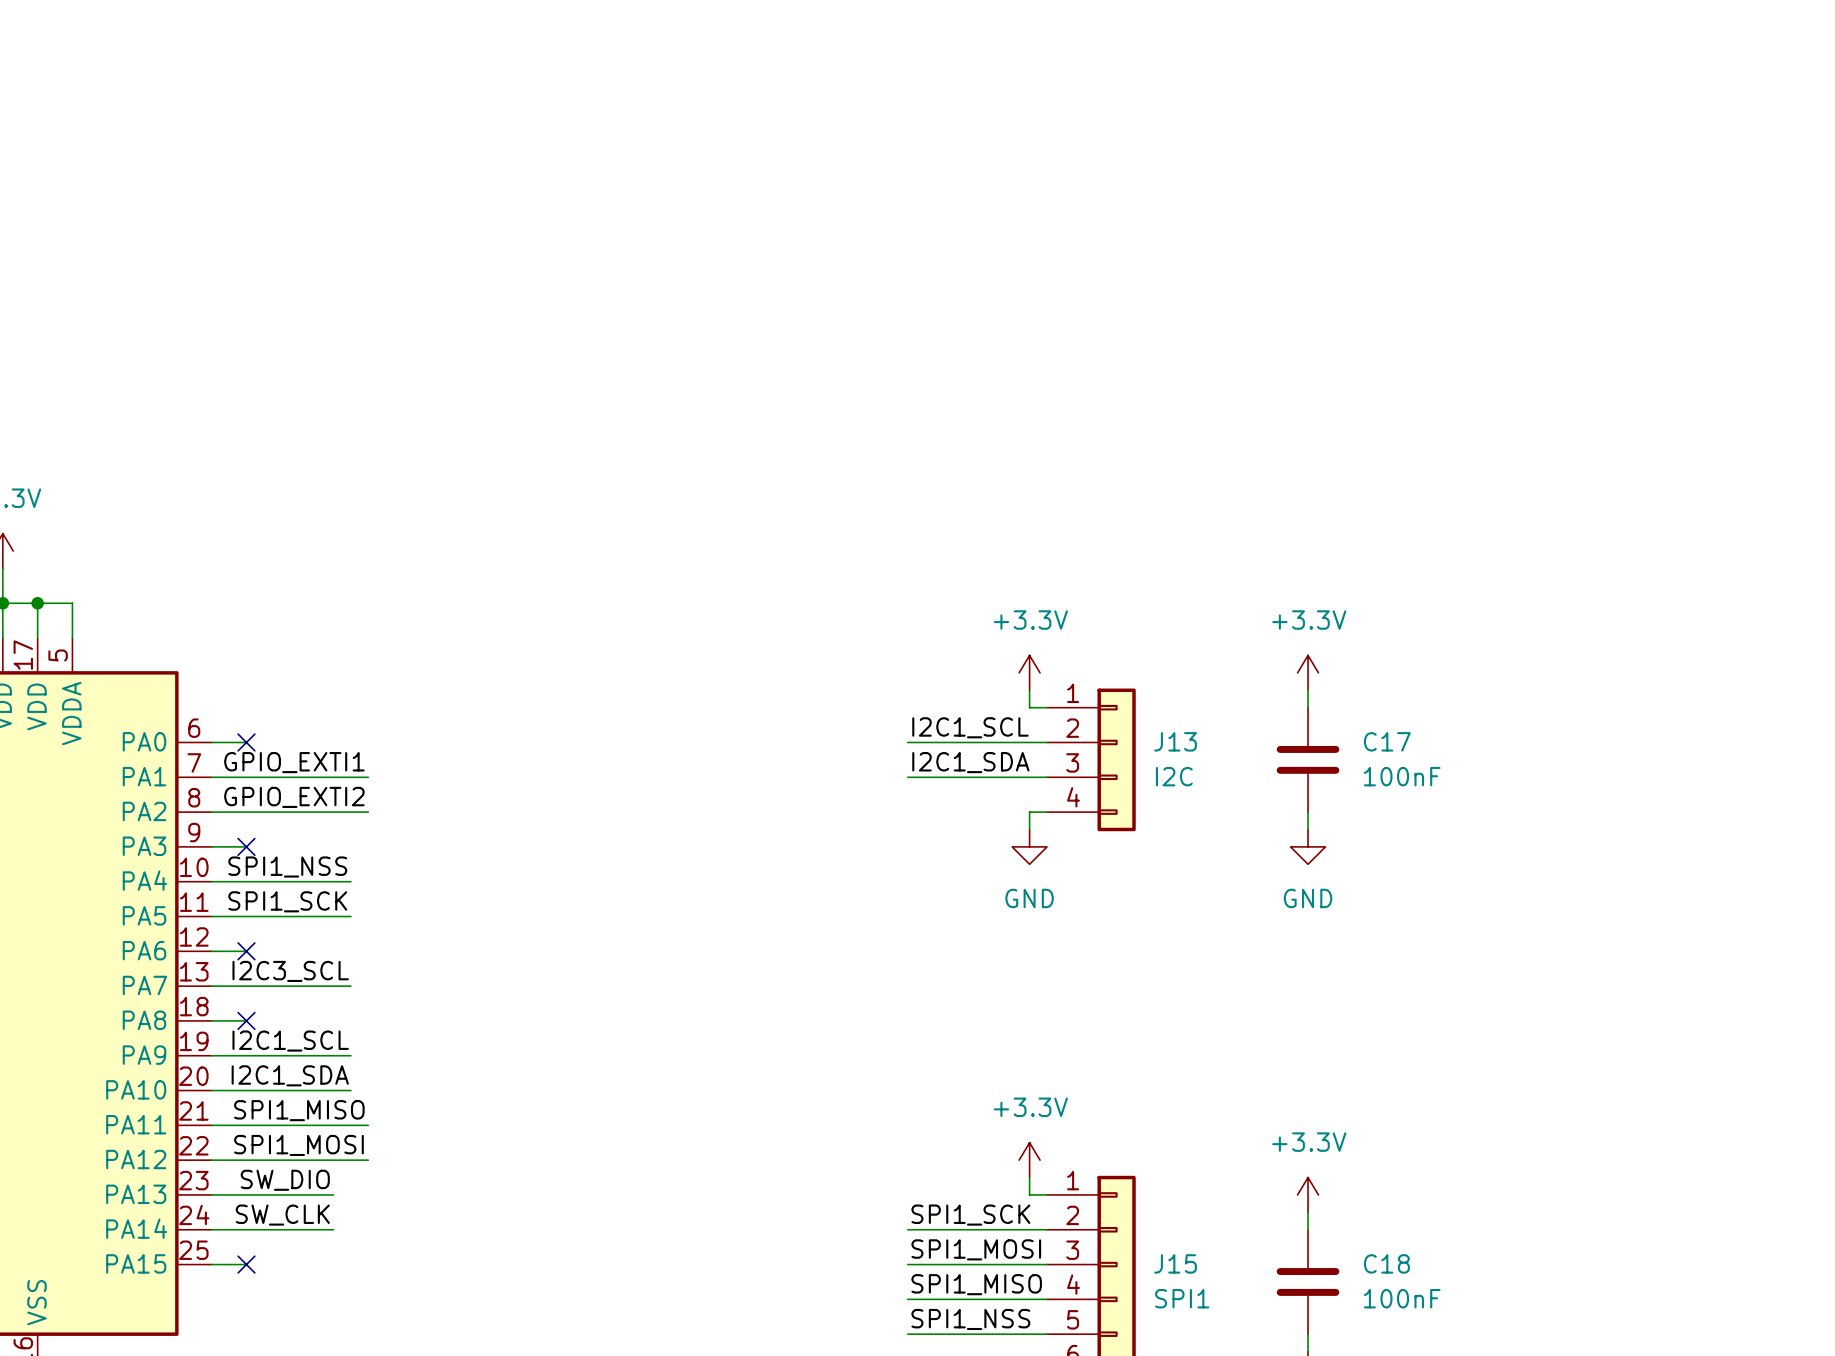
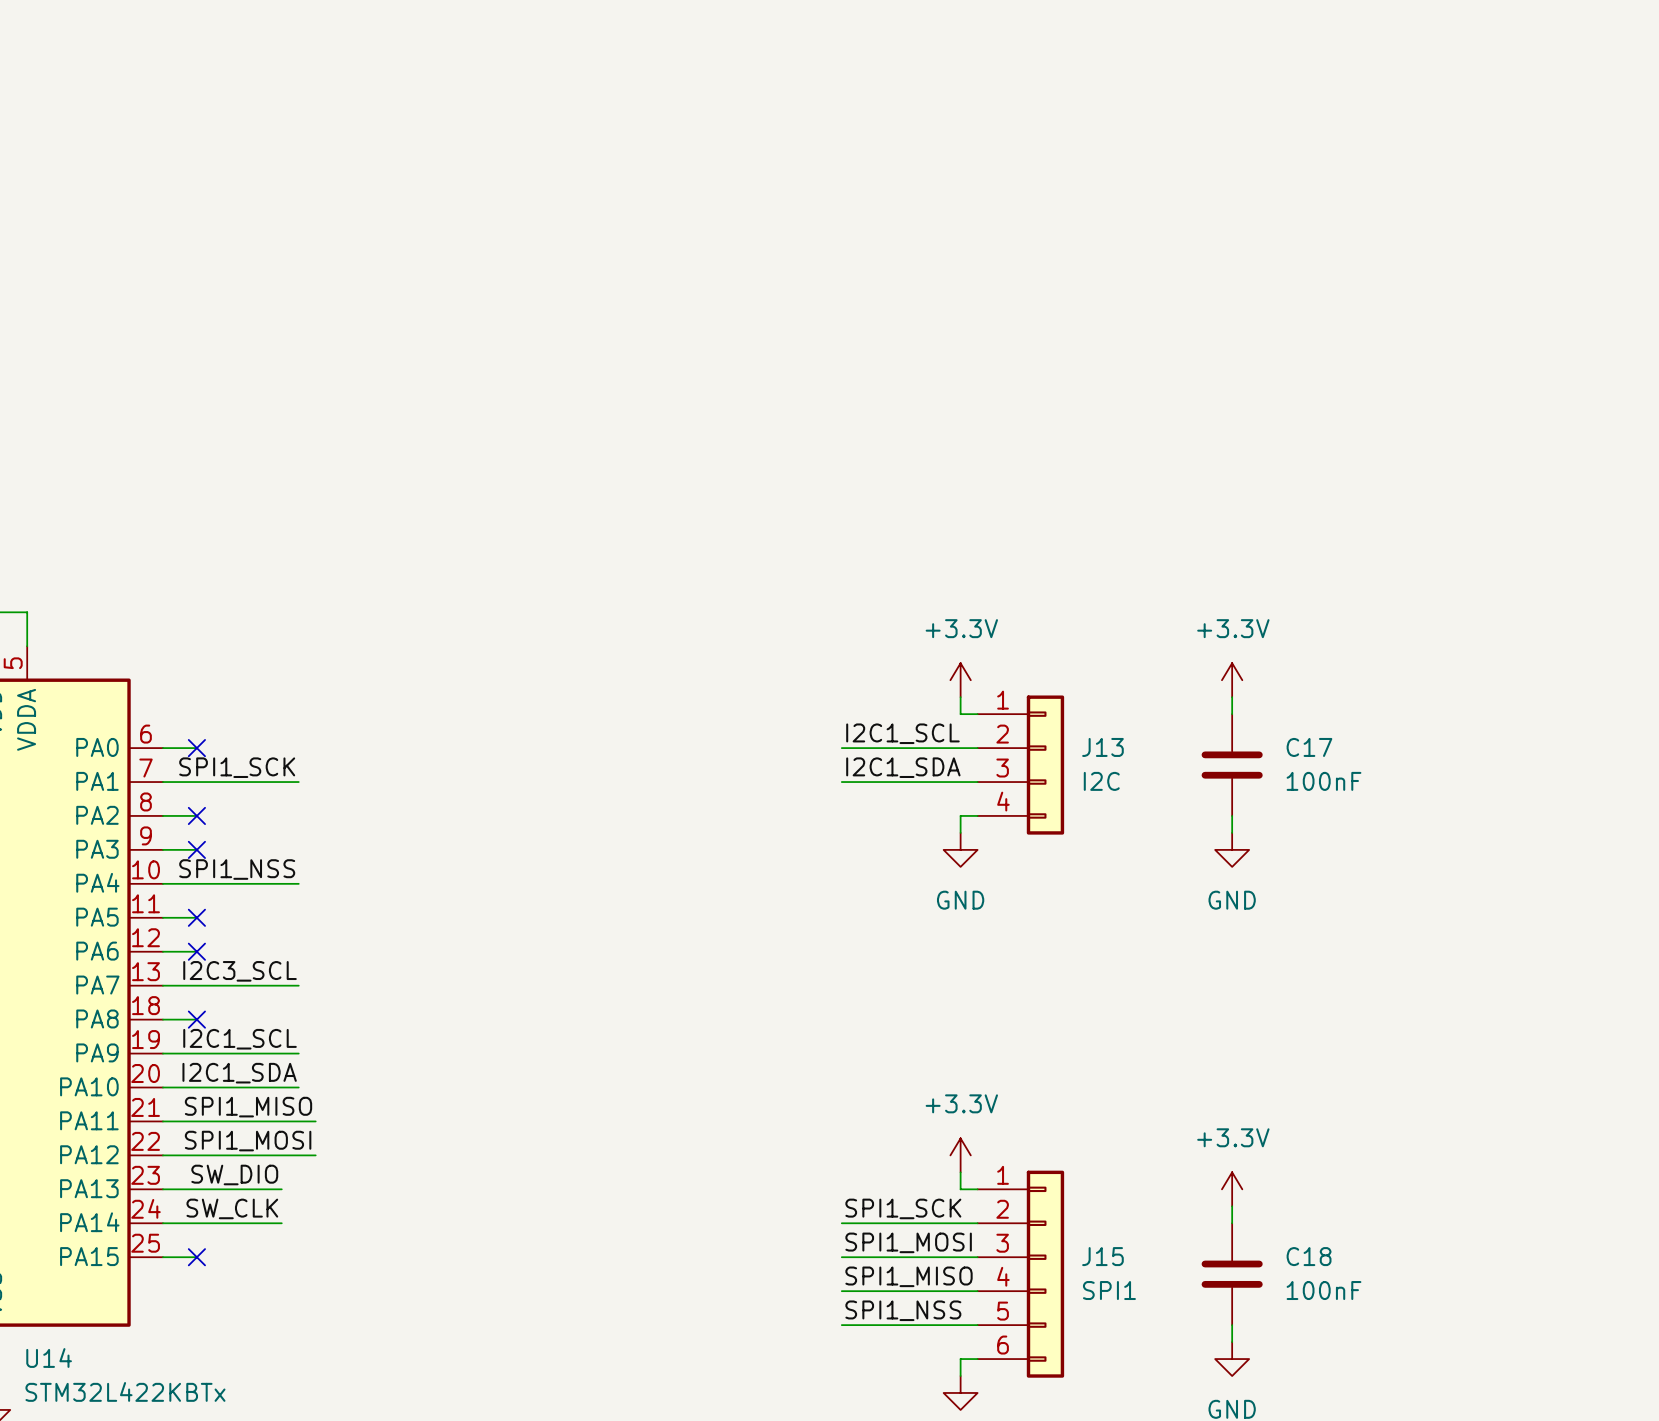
label: GPIO_EXTI1 (294, 762) -> none
wire: (350, 777) (368, 777) -> none
label: GPIO_EXTI2 (294, 797) -> none
wire: (246, 812) (368, 812) -> none
no-connect mark: none -> (196, 815)
label position: SPI1_SCK (287, 901) -> SPI1_SCK (237, 767)
wire: (246, 916) (350, 916) -> none
no-connect mark: none -> (196, 917)

